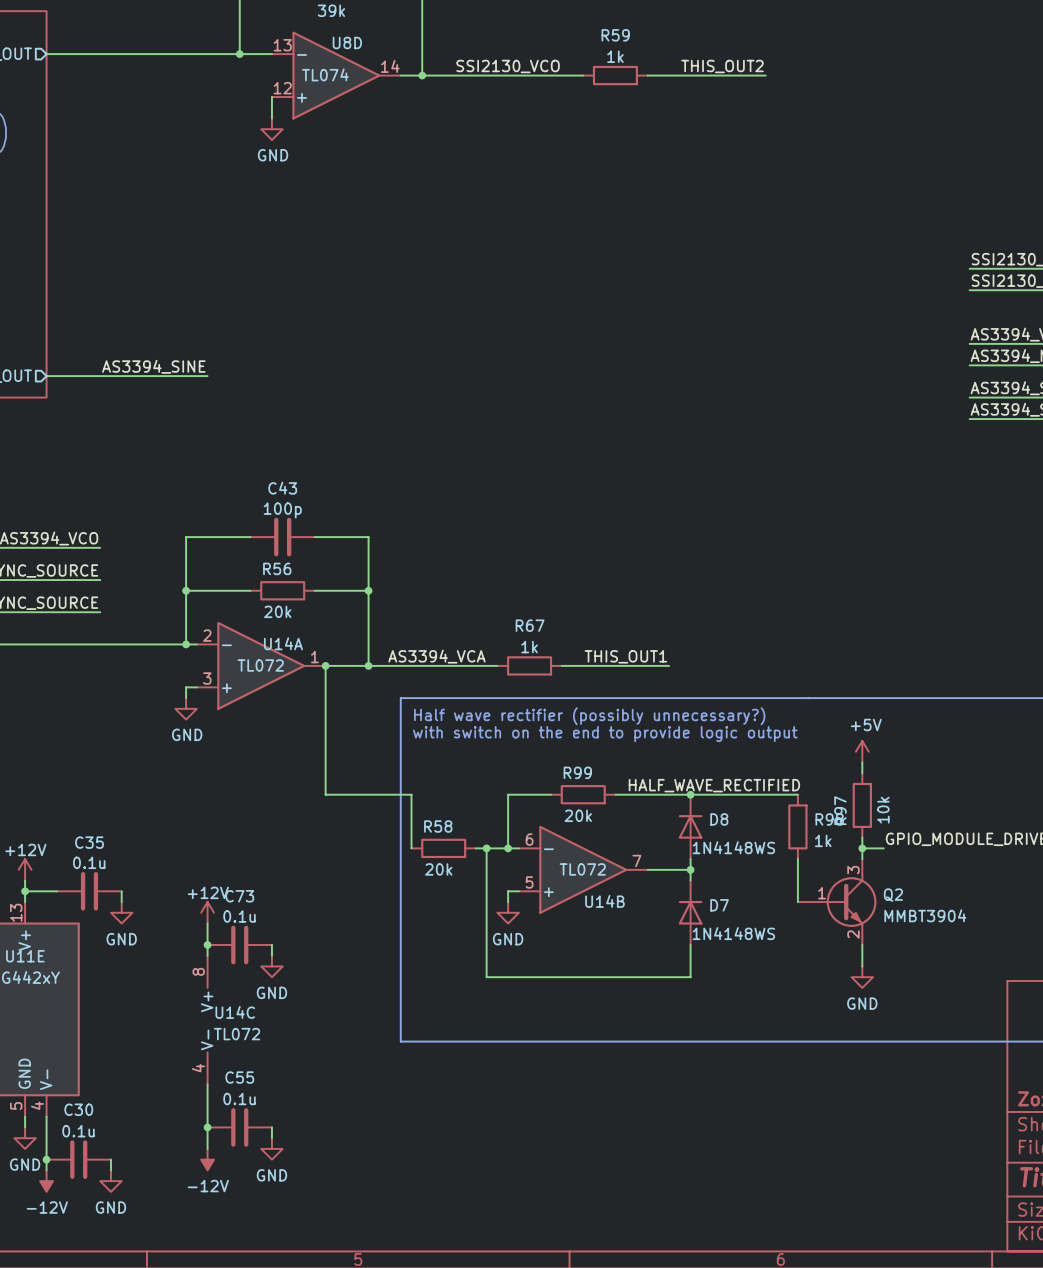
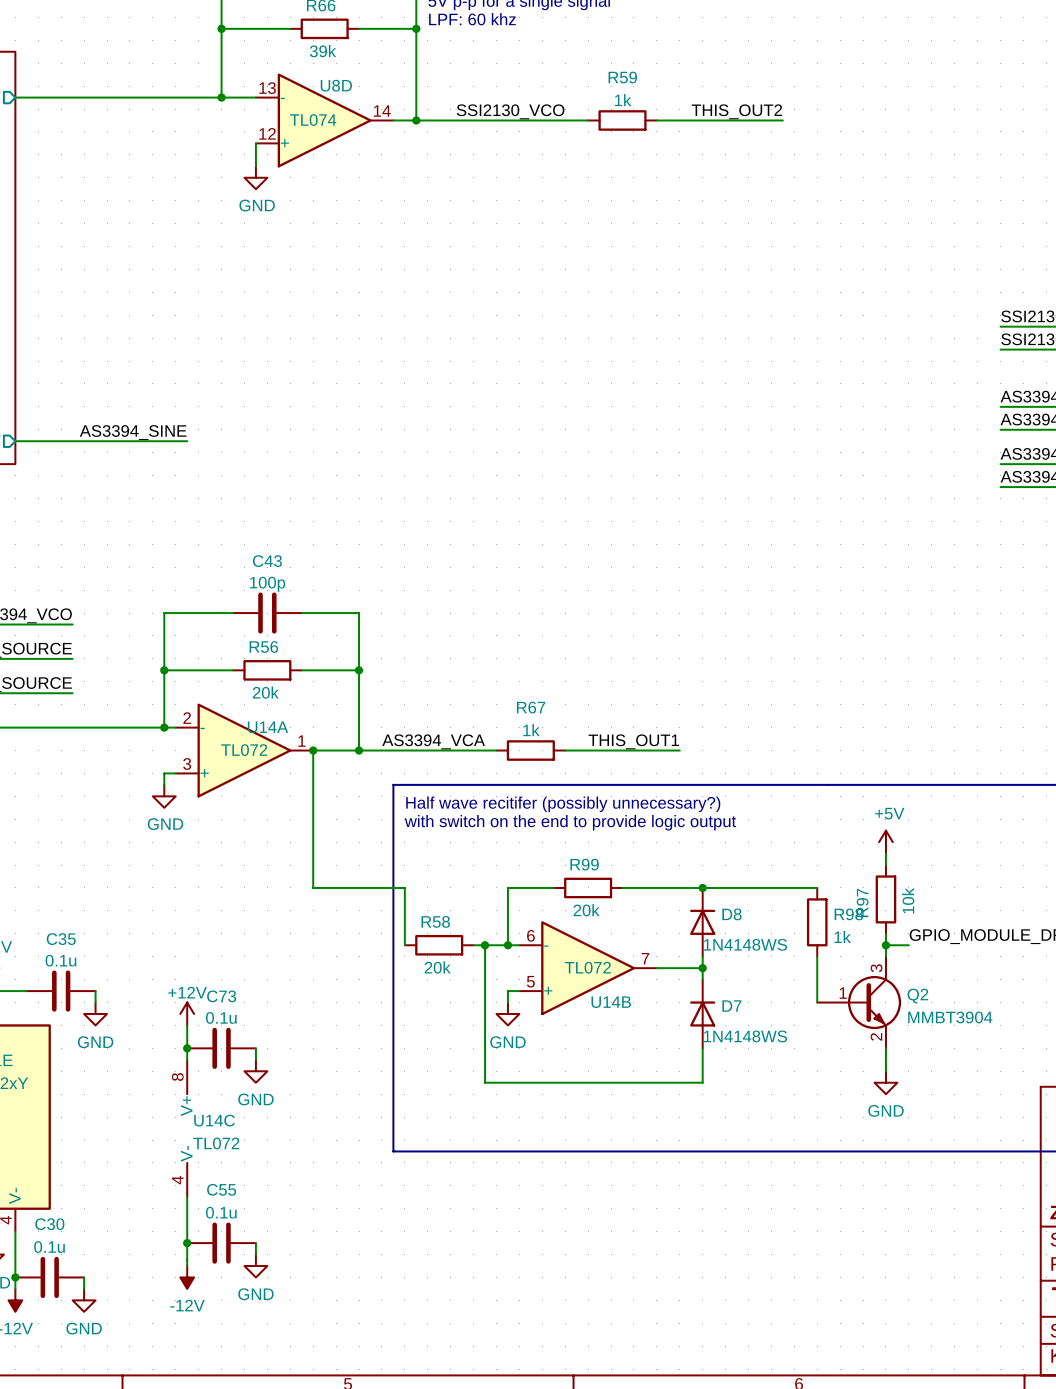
text: Half wave rectifier (possibly unnecessary?) (589, 716) -> Half wave recitifer (possibly unnecessary?) (563, 804)
label: HALF_WAVE_RECTIFIED (714, 785) -> none

